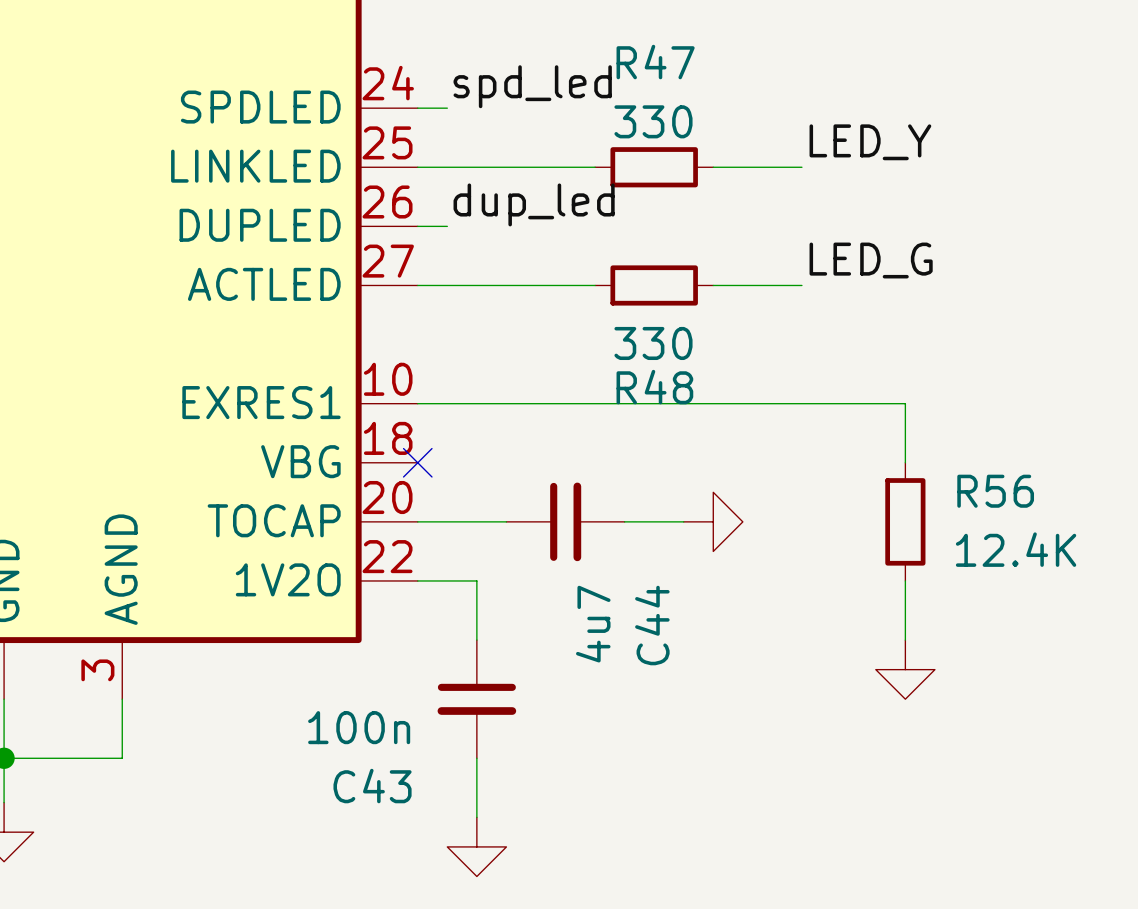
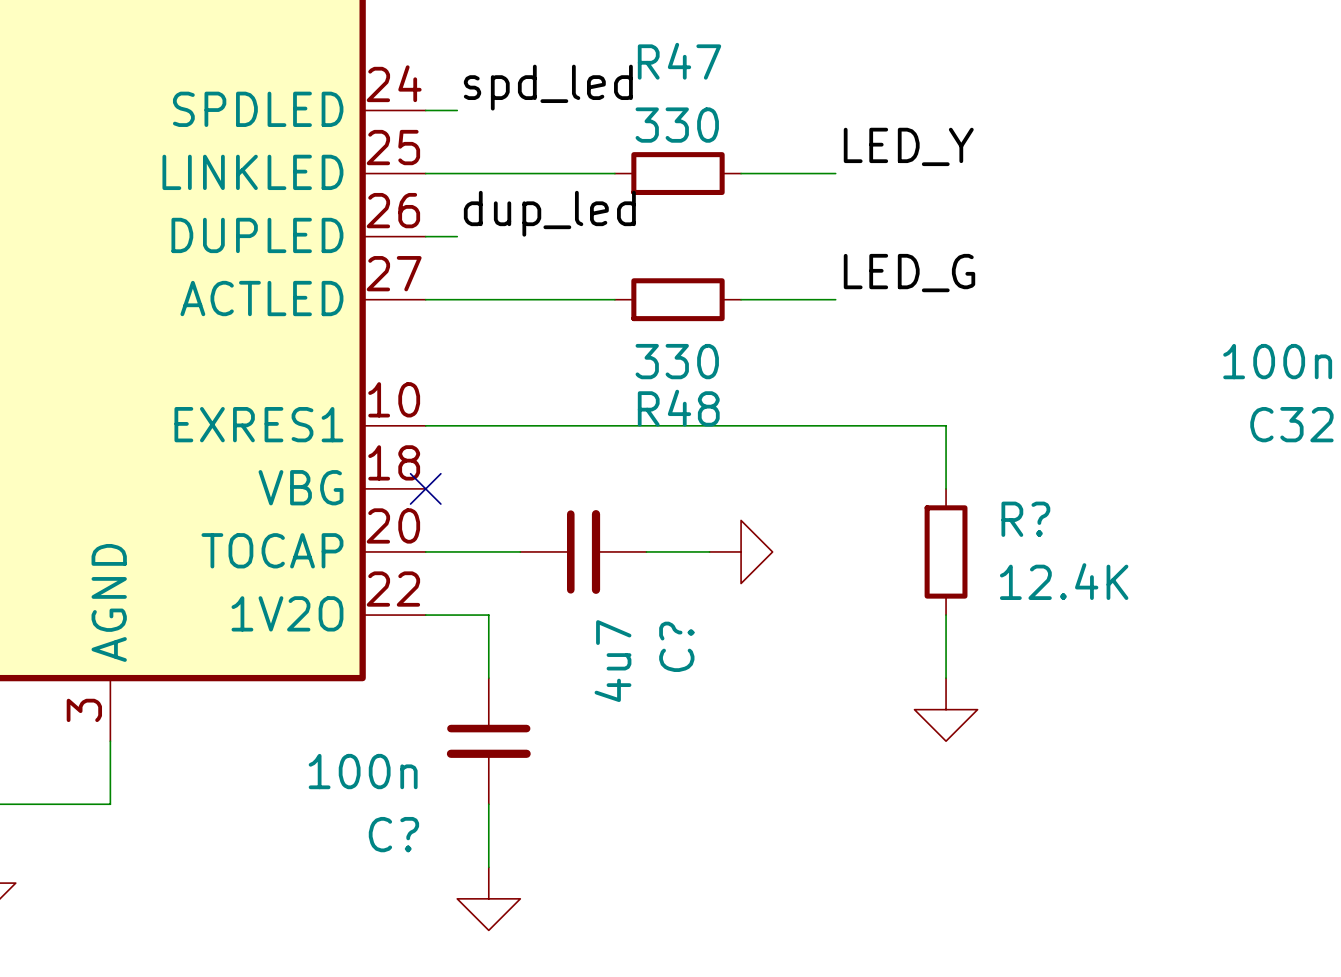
R56 name: R56 (995, 491) -> R? (1025, 519)
C44 name: C44 (652, 625) -> C? (676, 646)
C43 name: C43 (372, 786) -> C? (393, 834)

